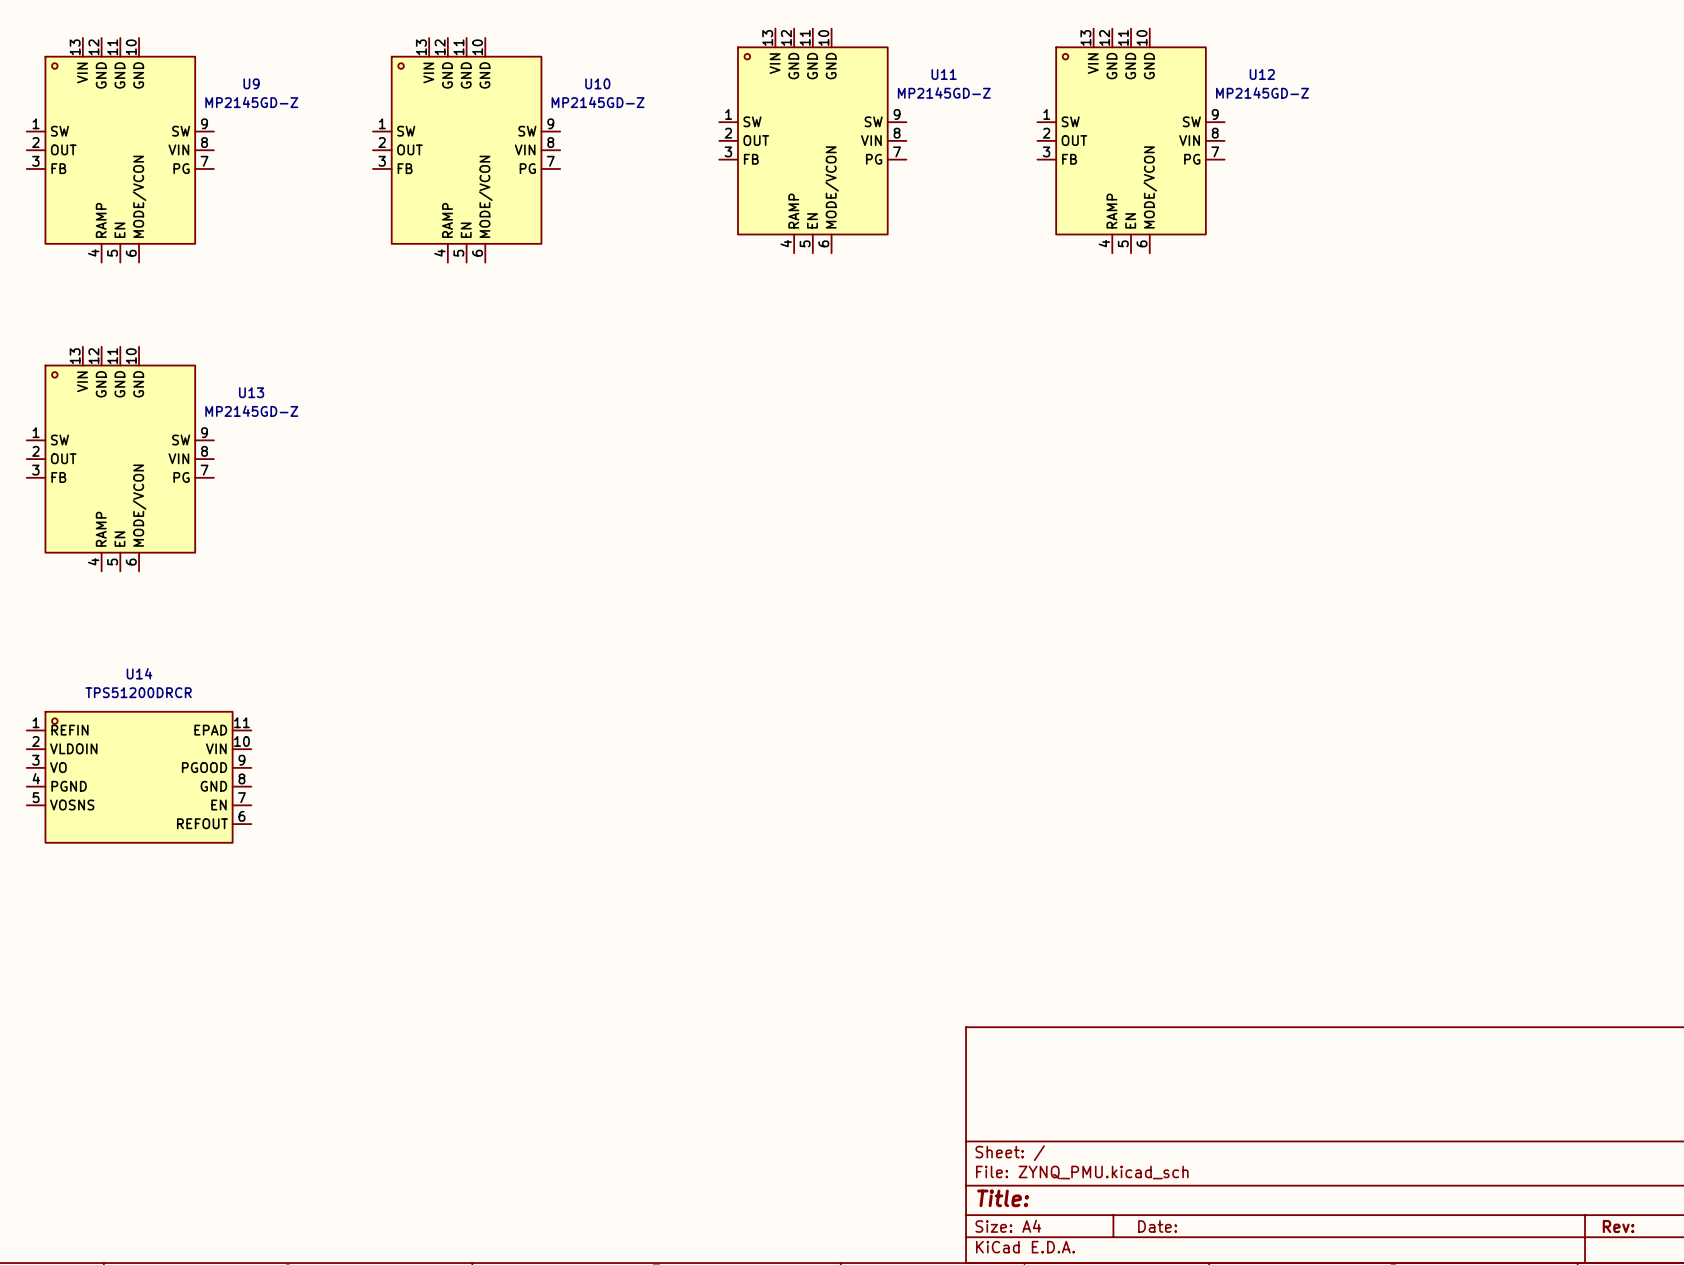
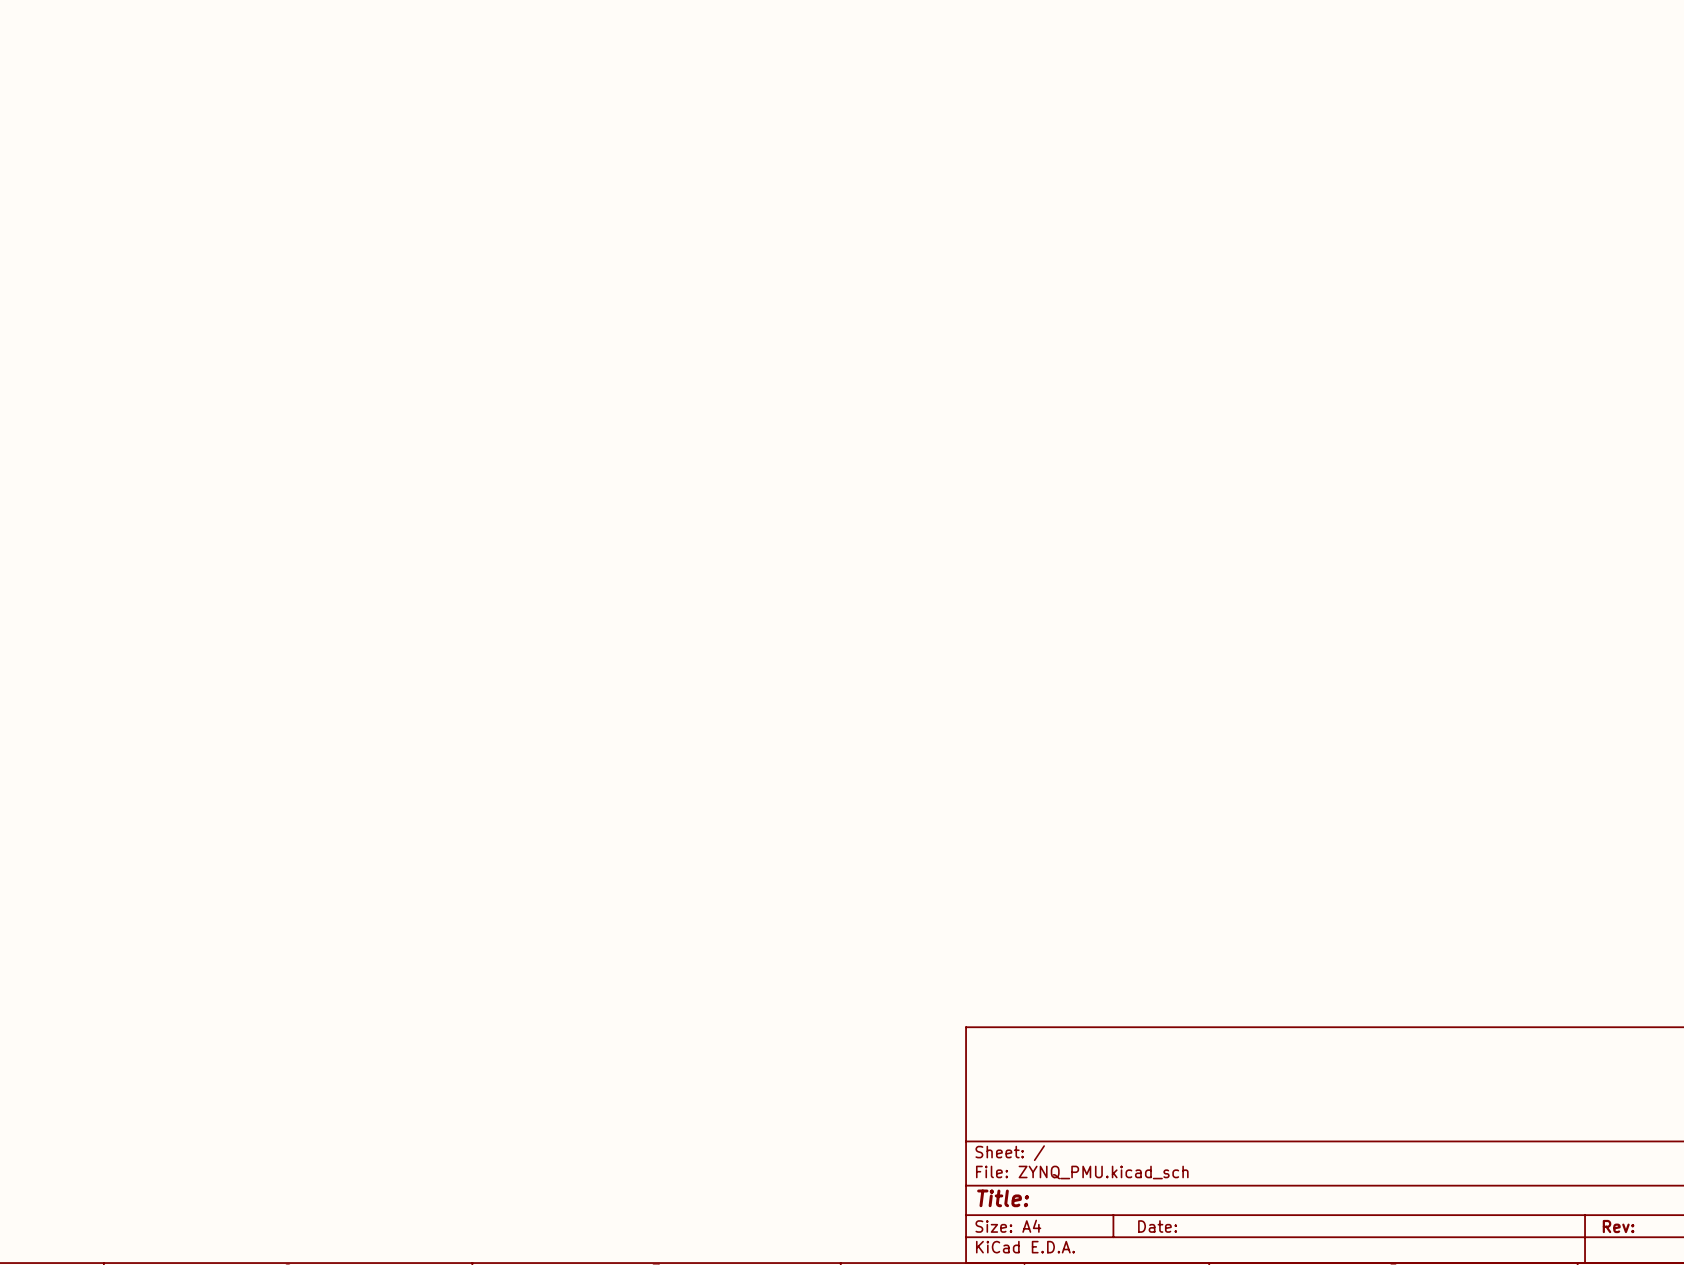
U11: MP2145GD-Z (812, 140) -> none
U12: MP2145GD-Z (1131, 140) -> none
U9: MP2145GD-Z (120, 150) -> none
U10: MP2145GD-Z (466, 150) -> none
U13: MP2145GD-Z (120, 459) -> none
U14: TPS51200DRCR (139, 777) -> none

